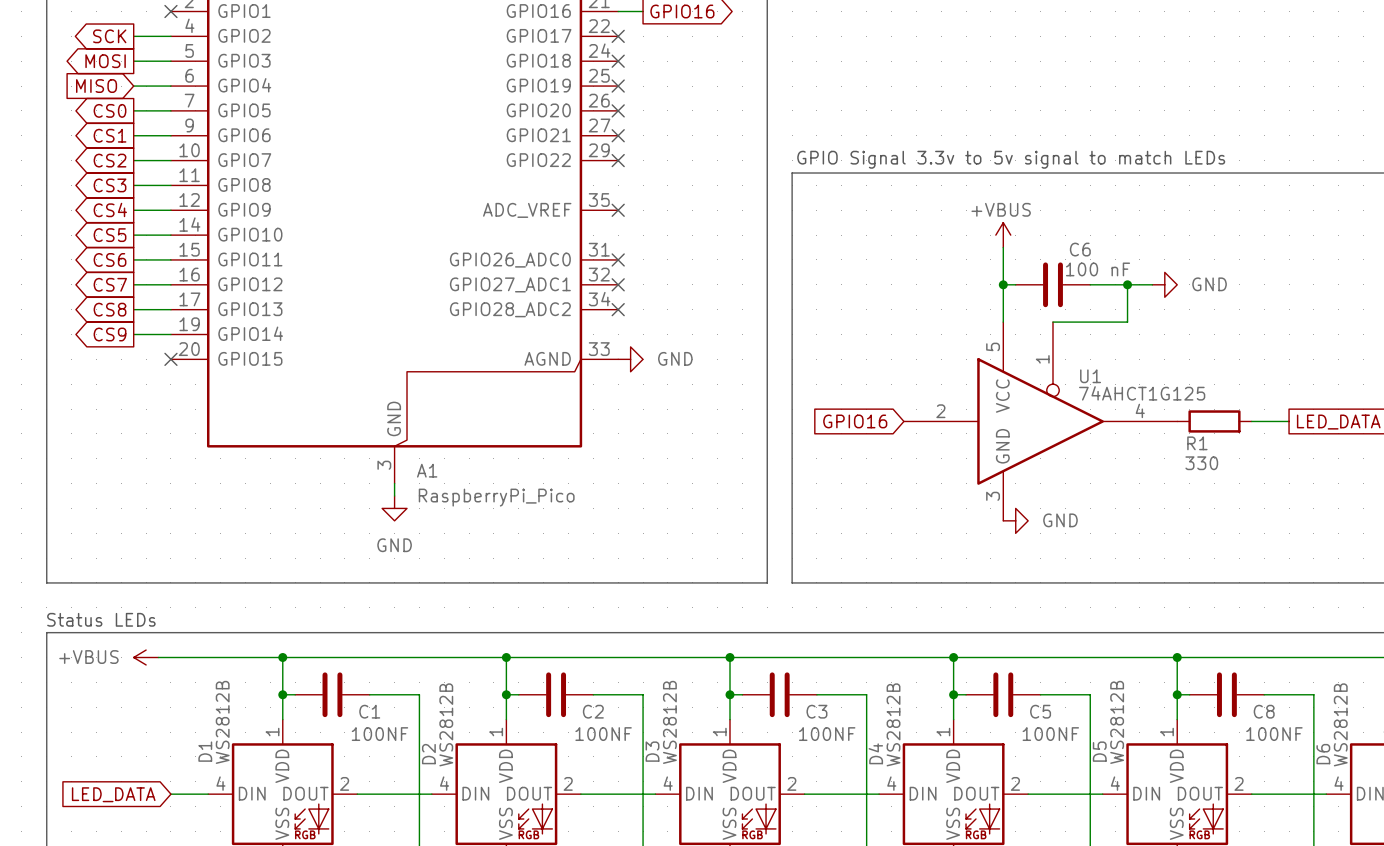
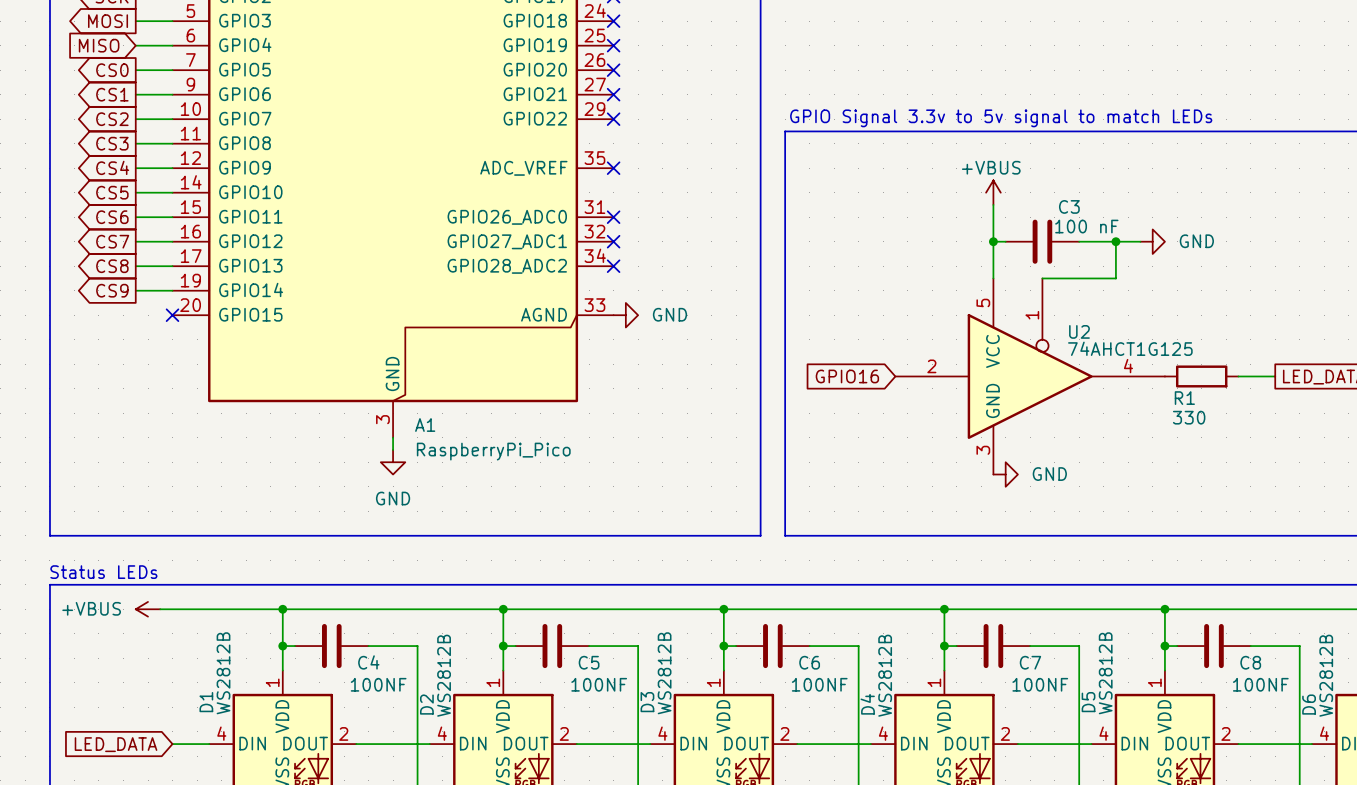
C6 name: C6 (1080, 249) -> C3 (1069, 206)
U1 name: U1 (1090, 376) -> U2 (1079, 331)
C1 name: C1 (369, 711) -> C4 (368, 662)
C2 name: C2 (593, 711) -> C5 (589, 662)
C3 name: C3 (816, 711) -> C6 (809, 662)
C5 name: C5 (1040, 711) -> C7 (1030, 662)

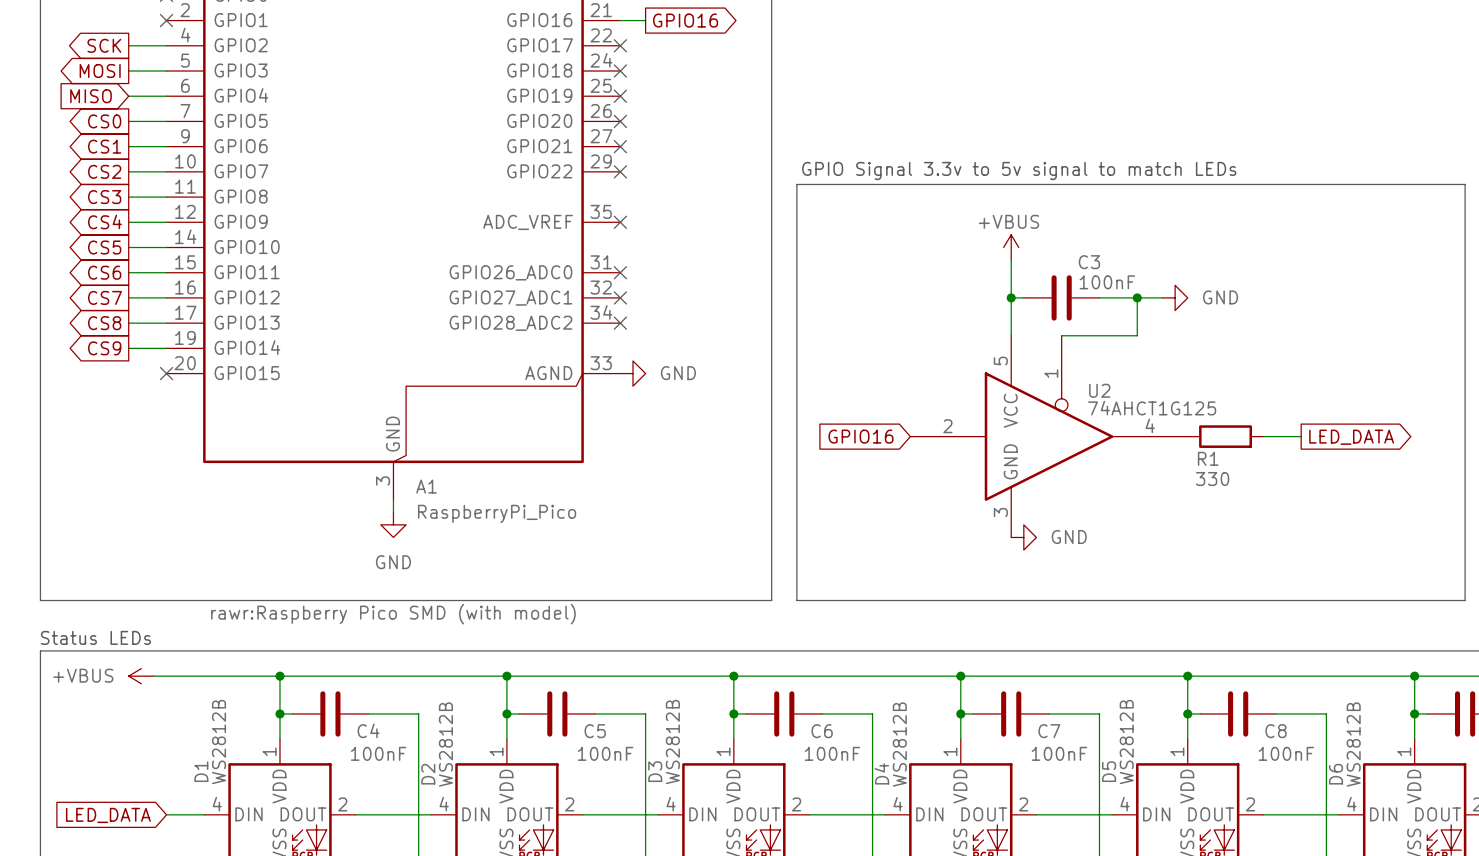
C3 value: 100 nF (1086, 226) -> 100nF (1107, 282)
A1 text: none -> rawr:Raspberry Pico SMD (with model) (393, 614)
C4 value: 100NF (378, 684) -> 100nF (378, 753)
C5 value: 100NF (599, 684) -> 100nF (605, 753)
C6 value: 100NF (819, 684) -> 100nF (832, 753)
C7 value: 100NF (1040, 684) -> 100nF (1059, 753)
C8 value: 100NF (1260, 684) -> 100nF (1286, 753)

